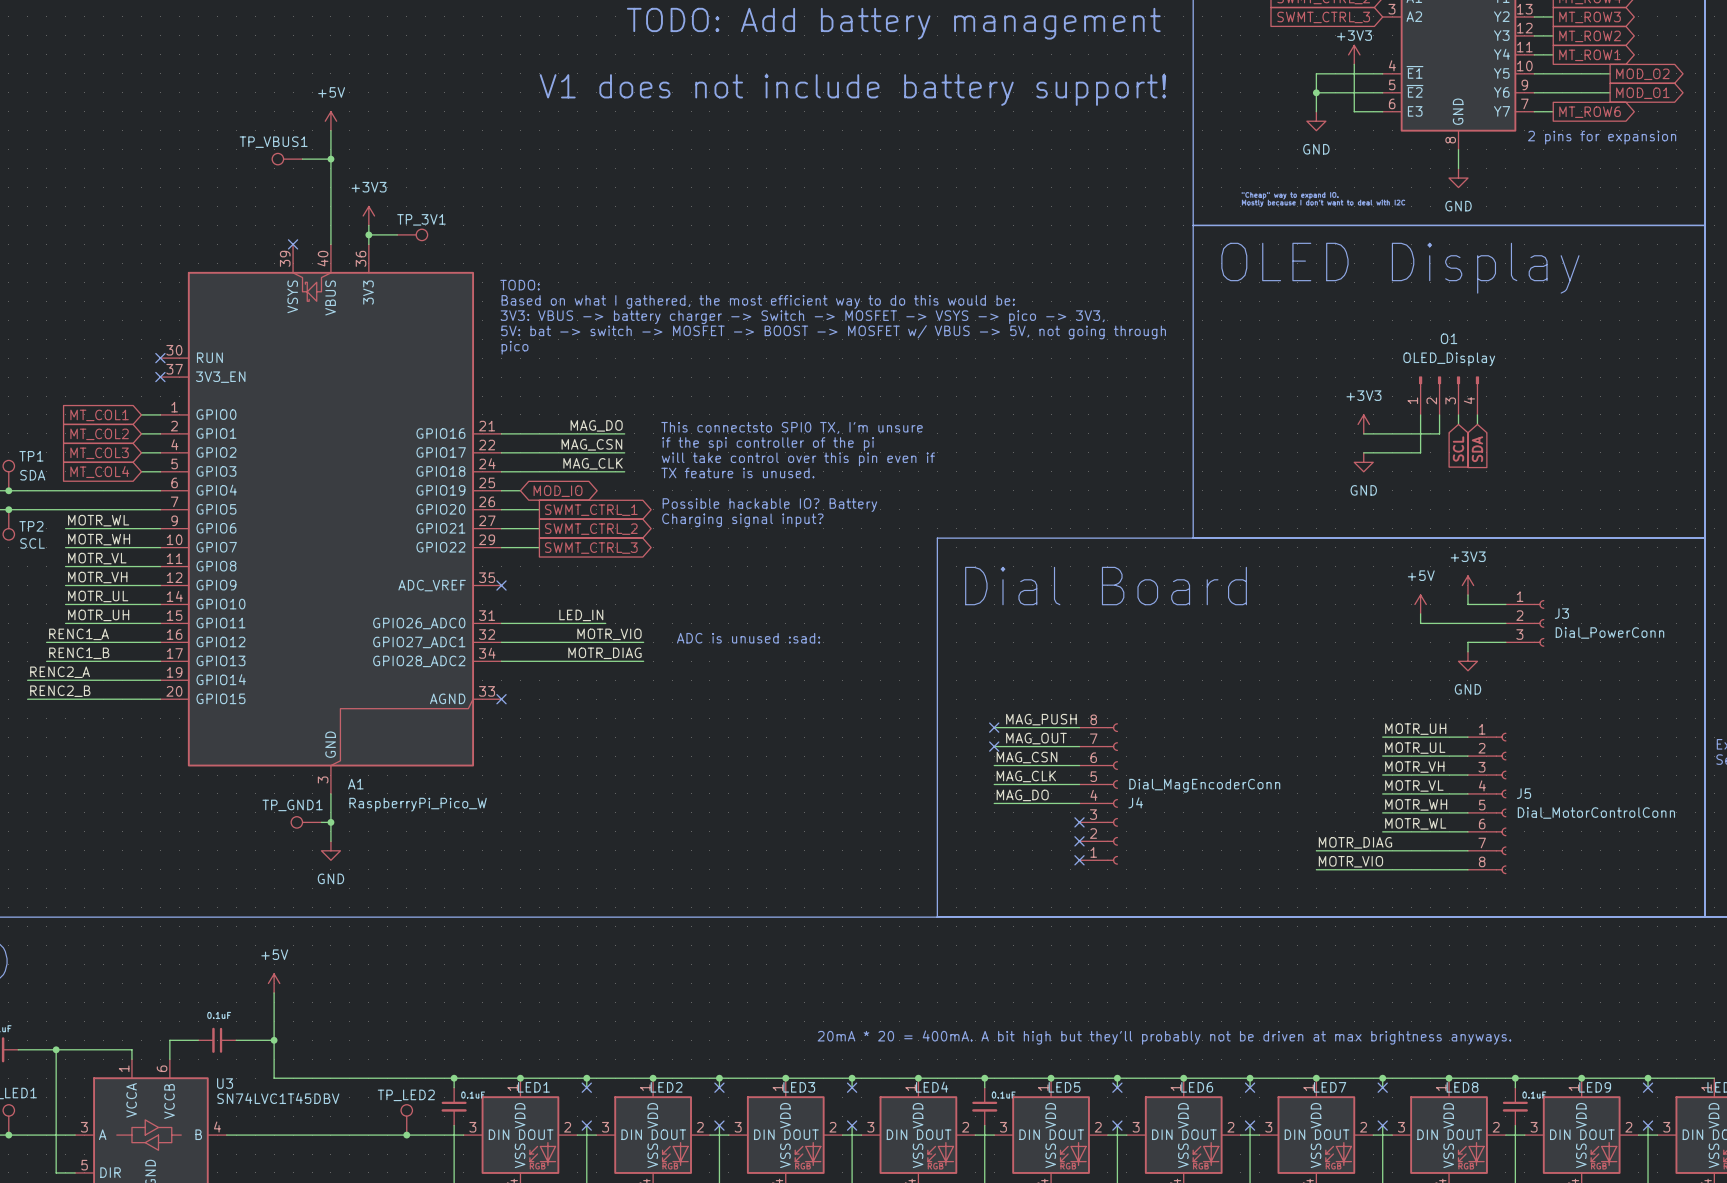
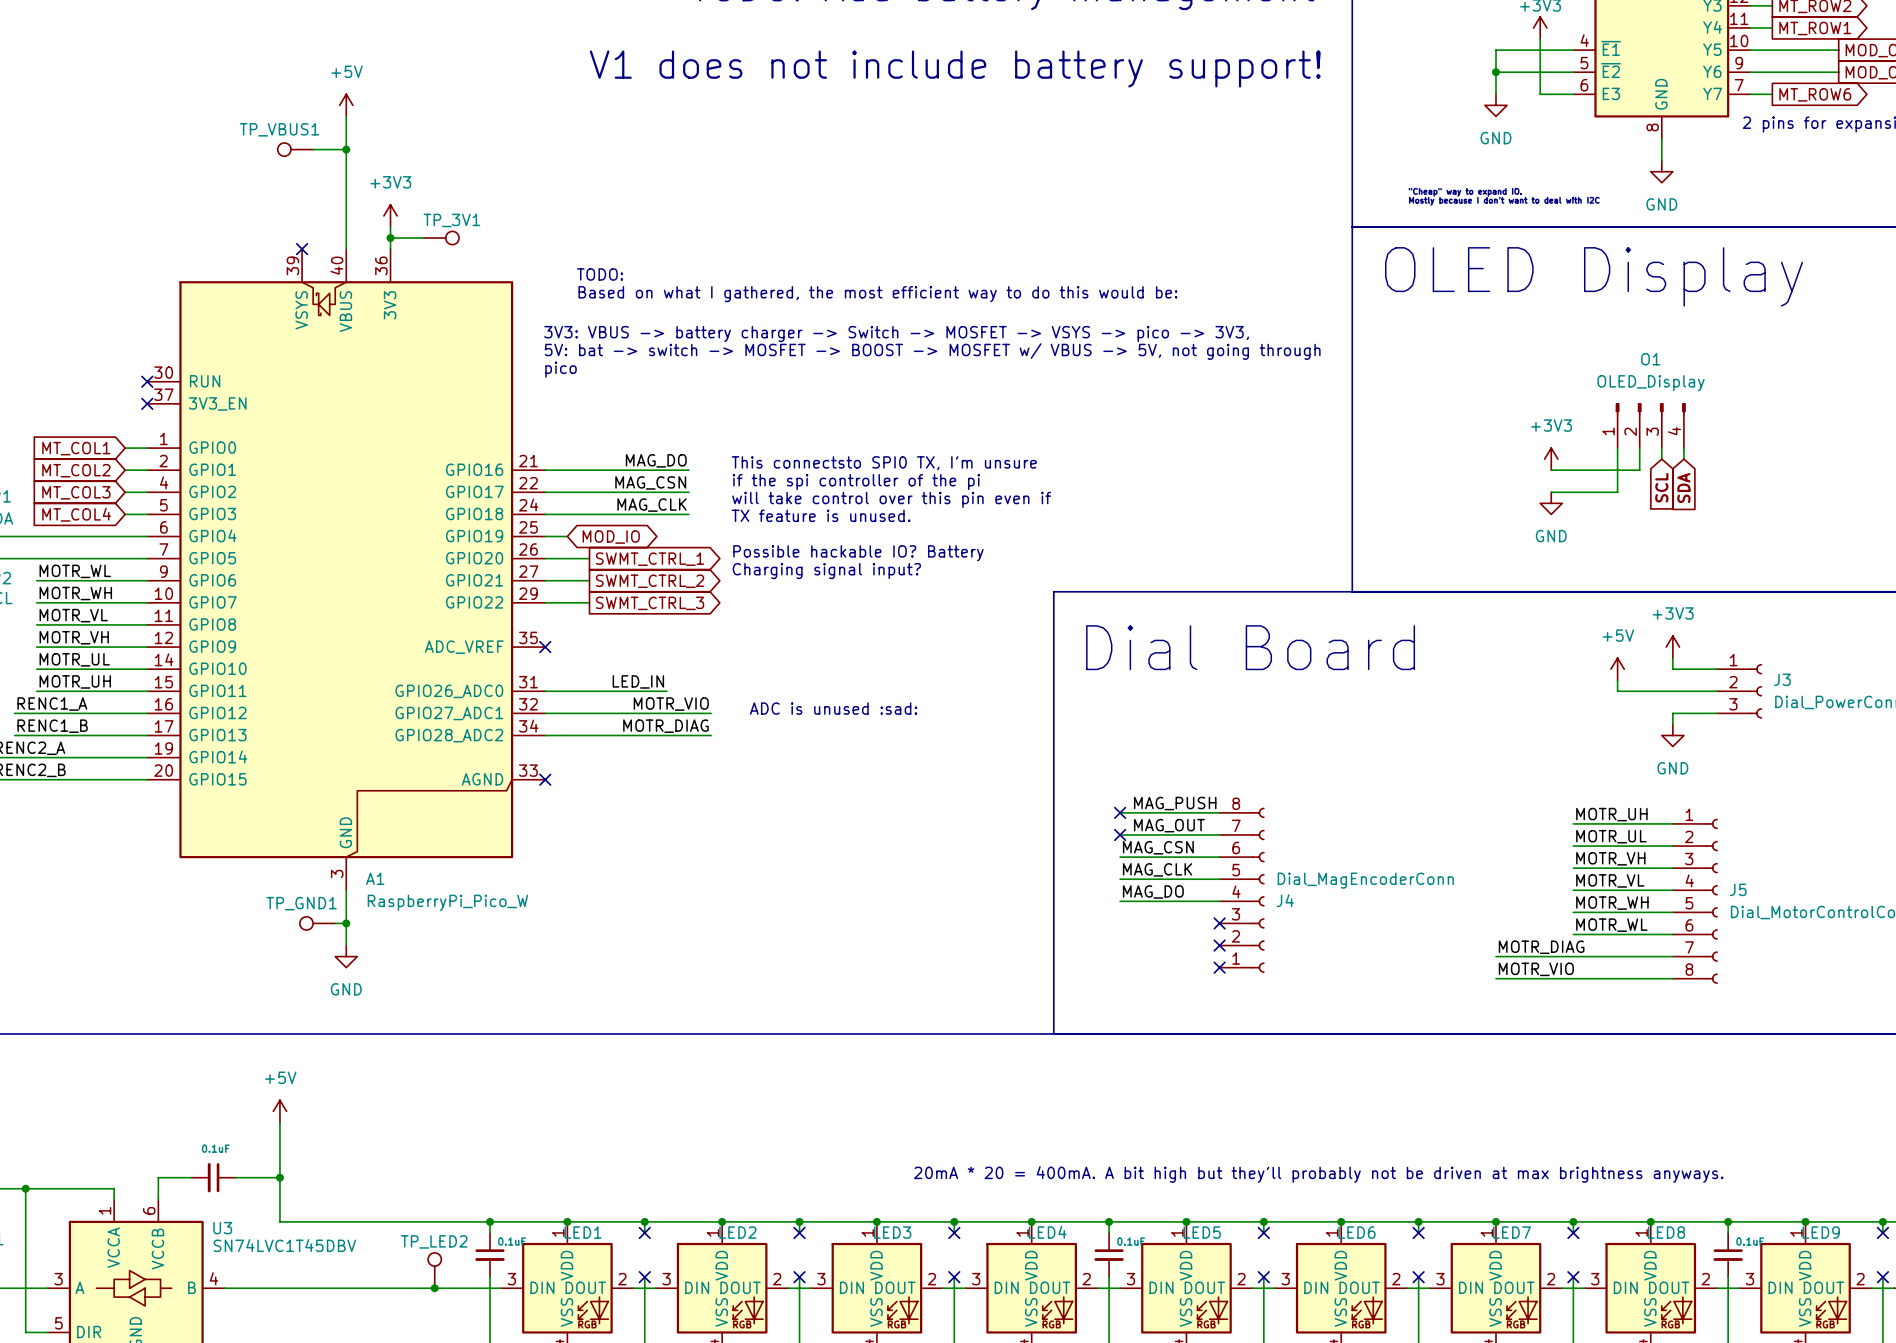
text position: TODO: (519, 285) -> TODO: (599, 274)
text position: Based on what I gathered, the most efficient way to do this would be: (758, 301) -> Based on what I gathered, the most efficient way to do this would be: (877, 294)

